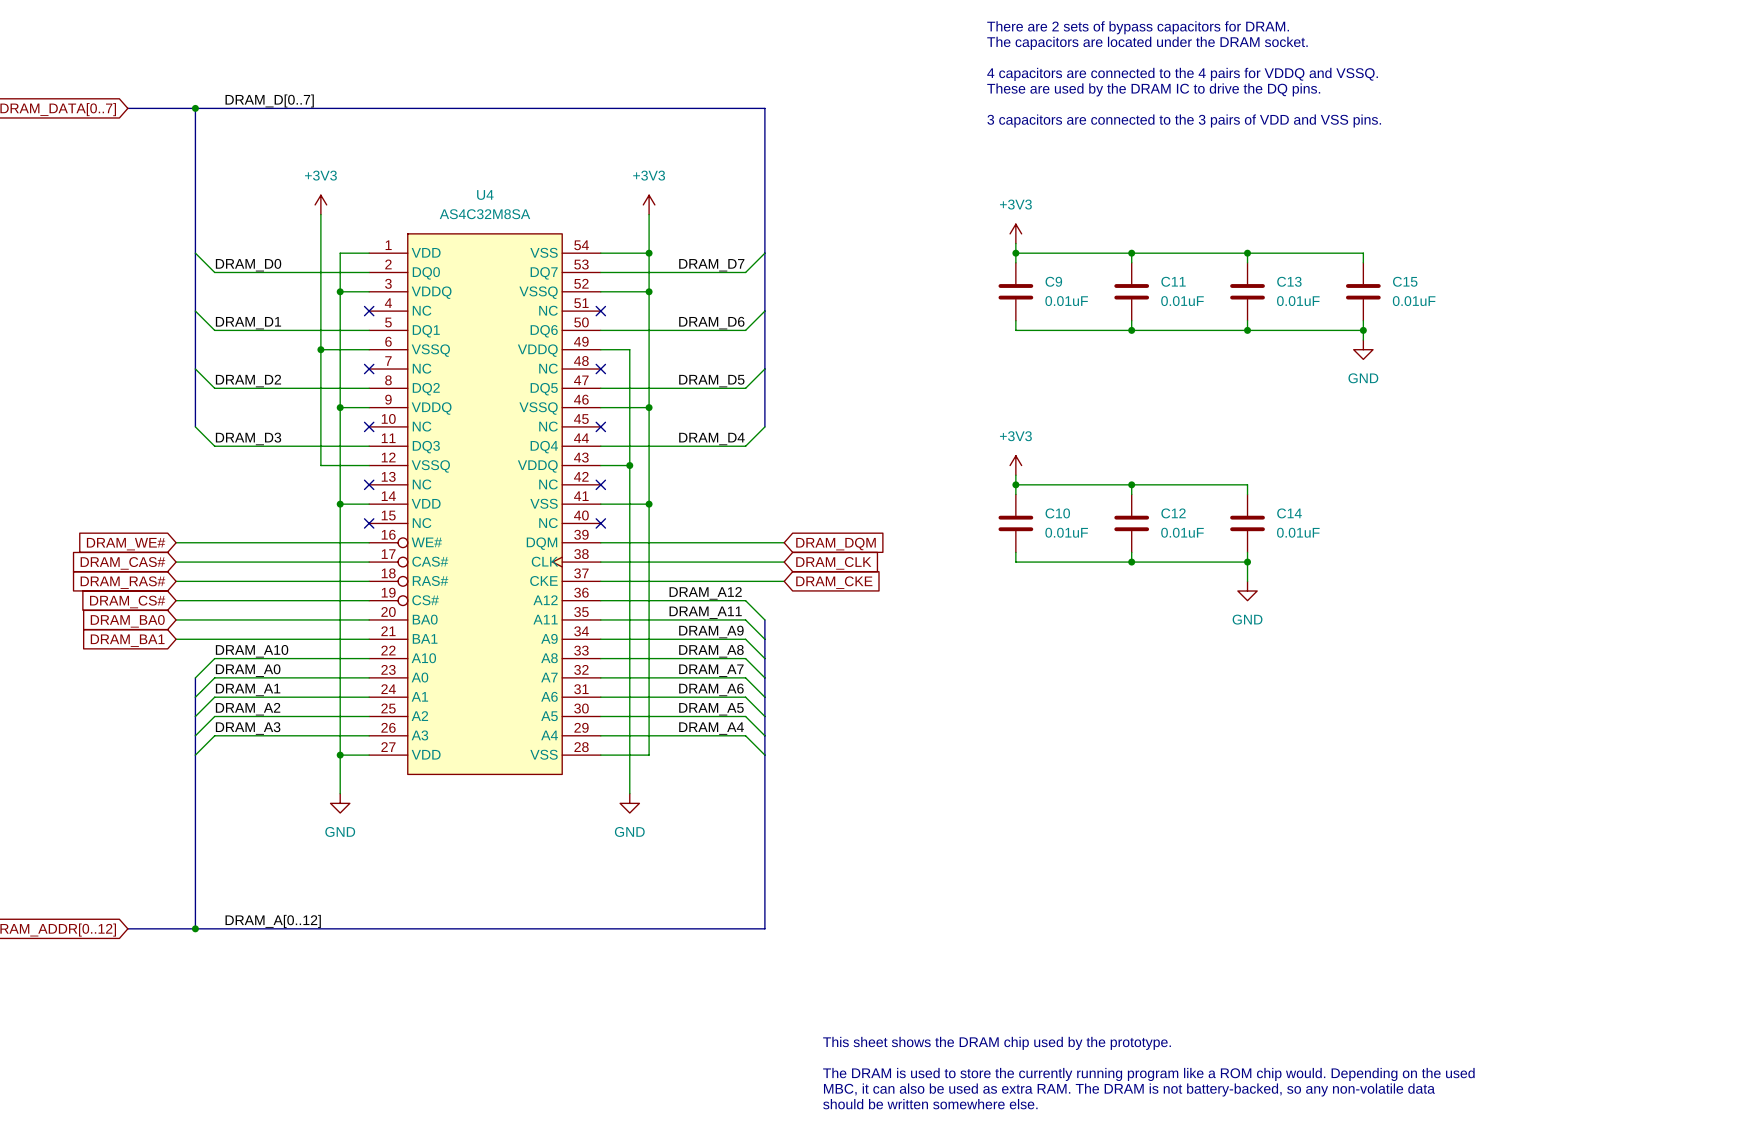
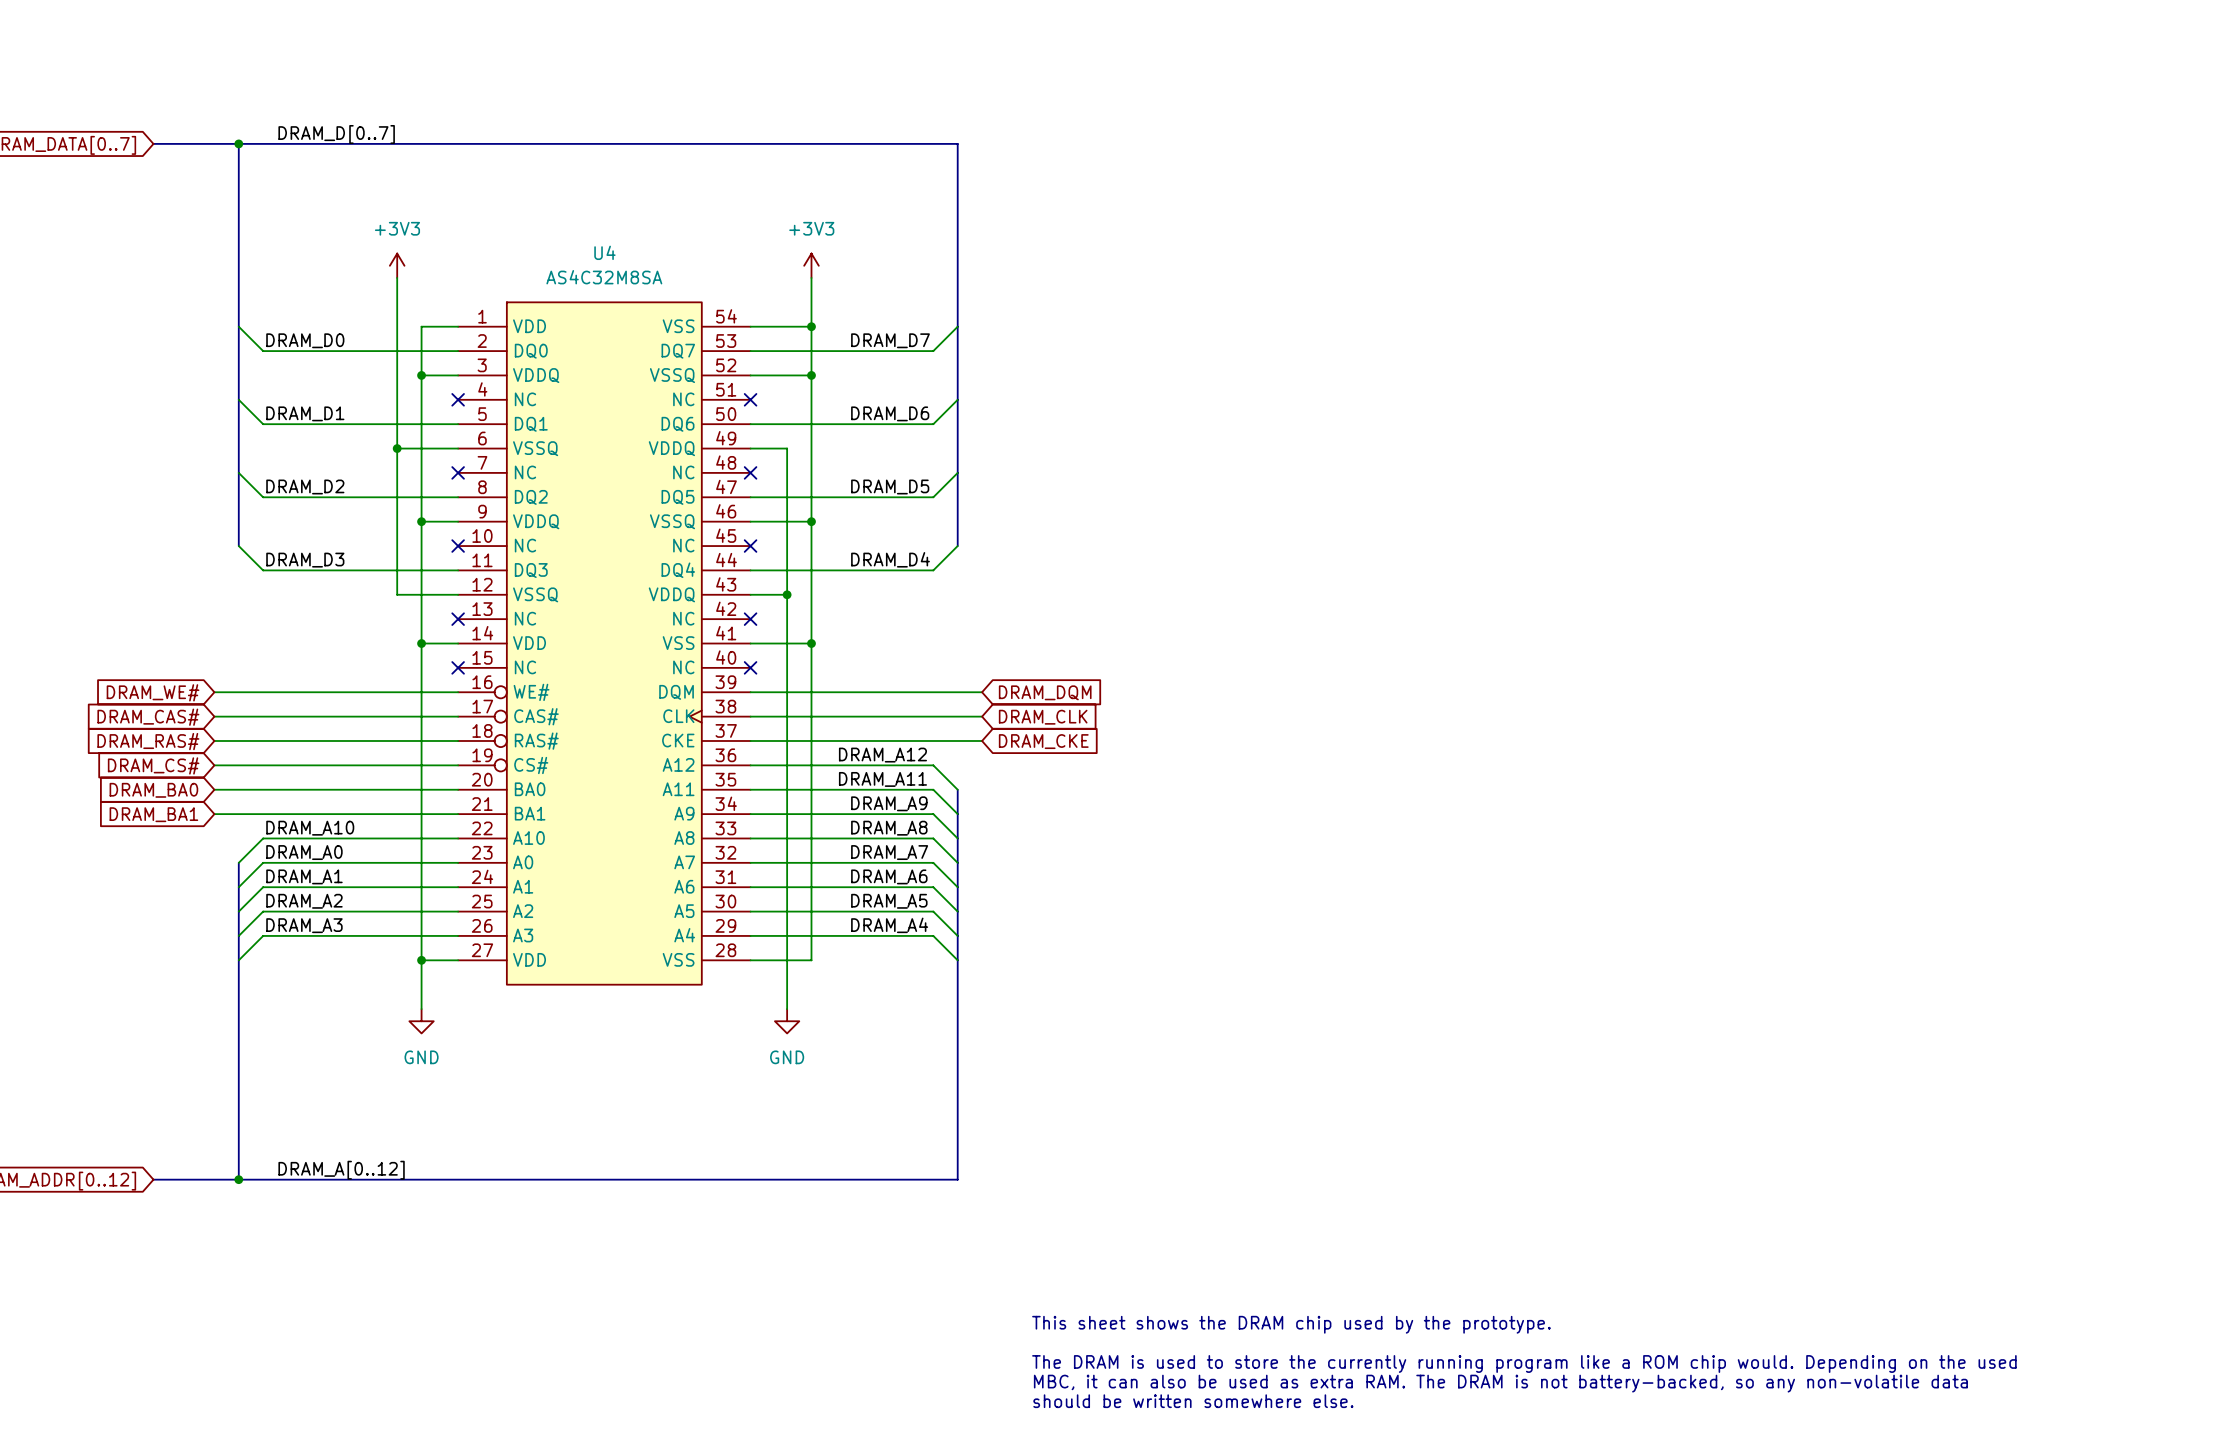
text: There are 2 sets of bypass capacitors for DRAM. (1138, 27) -> none
text: The capacitors are located under the DRAM socket. (1147, 43) -> none
text: 4 capacitors are connected to the 4 pairs for VDDQ and VSSQ. (1182, 74) -> none
text: These are used by the DRAM IC to drive the DQ pins. (1153, 89) -> none
text: 3 capacitors are connected to the 3 pairs of VDD and VSS pins. (1184, 120) -> none
power symbol: +3V3 (1015, 233) -> none
wire: (1015, 243) (1015, 262) -> none
wire: (1015, 253) (1363, 253) (1363, 262) -> none
junction: (1015, 253) -> none
wire: (1131, 253) (1131, 262) -> none
junction: (1131, 253) -> none
wire: (1247, 253) (1247, 262) -> none
junction: (1247, 253) -> none
C9: 0.01uF (1015, 291) -> none
C11: 0.01uF (1131, 291) -> none
C13: 0.01uF (1247, 291) -> none
C15: 0.01uF (1363, 291) -> none
wire: (1015, 320) (1015, 330) (1363, 330) -> none
wire: (1131, 320) (1131, 330) -> none
wire: (1247, 320) (1247, 330) -> none
wire: (1363, 320) (1363, 340) -> none
junction: (1131, 330) -> none
junction: (1247, 330) -> none
junction: (1363, 330) -> none
power symbol: GND (1363, 349) -> none
power symbol: +3V3 (1015, 465) -> none
wire: (1015, 475) (1015, 494) -> none
wire: (1015, 484) (1247, 484) (1247, 494) -> none
junction: (1015, 484) -> none
wire: (1131, 484) (1131, 494) -> none
junction: (1131, 484) -> none
C10: 0.01uF (1015, 523) -> none
C12: 0.01uF (1131, 523) -> none
C14: 0.01uF (1247, 523) -> none
wire: (1015, 552) (1015, 562) (1247, 562) -> none
wire: (1131, 552) (1131, 562) -> none
wire: (1247, 552) (1247, 581) -> none
junction: (1131, 562) -> none
junction: (1247, 562) -> none
power symbol: GND (1247, 591) -> none

